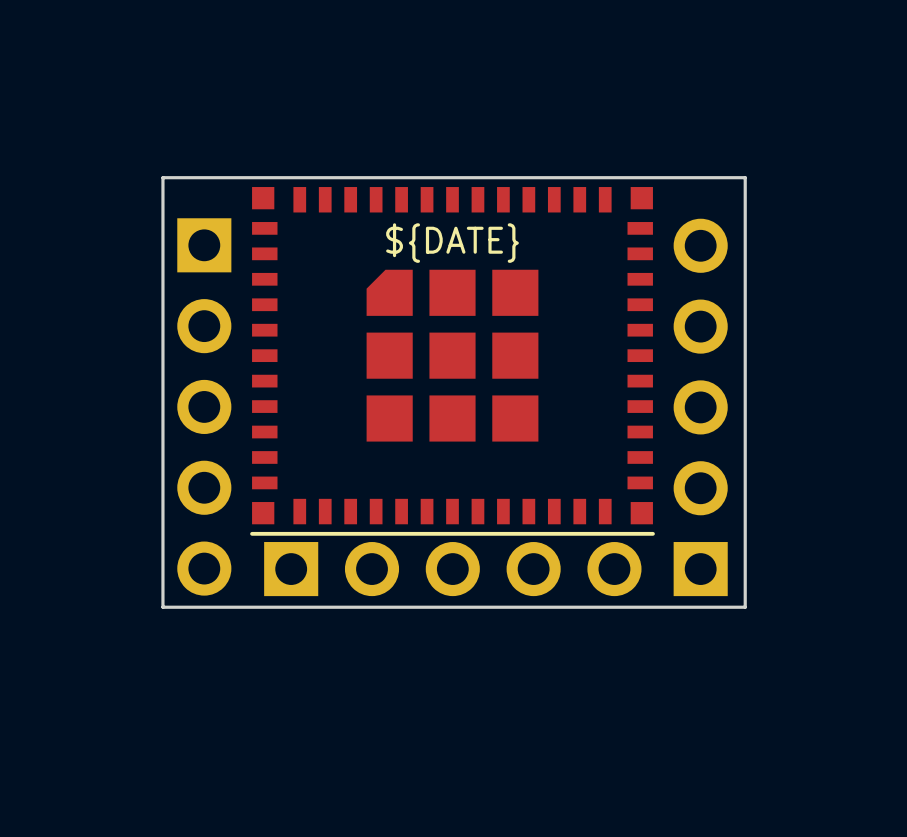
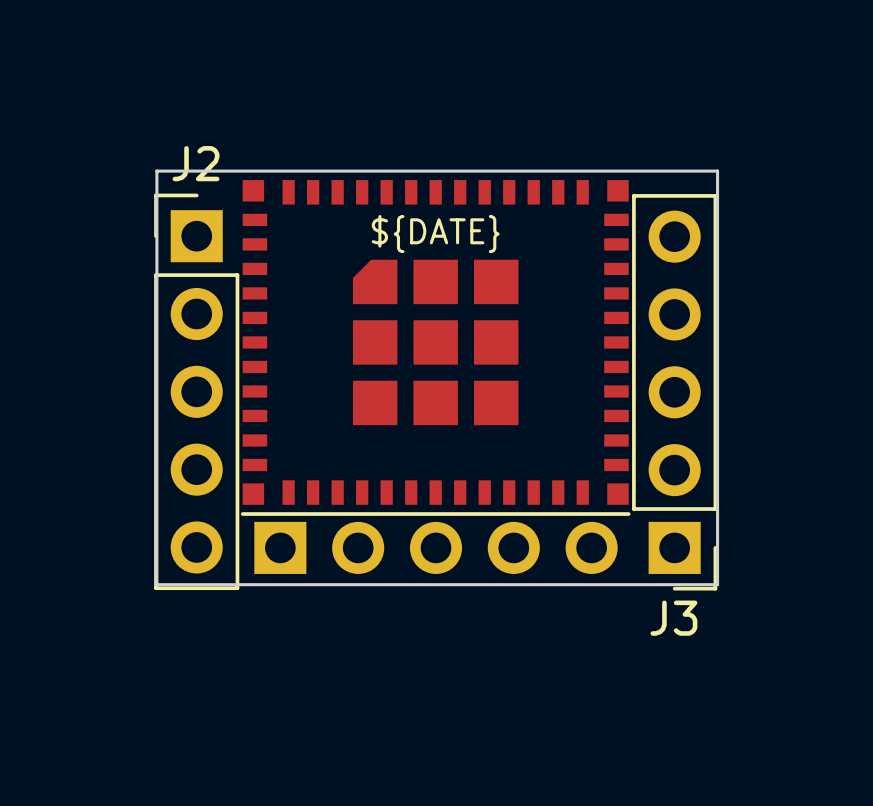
J2: none -> (196, 391)
J3: none -> (674, 392)

